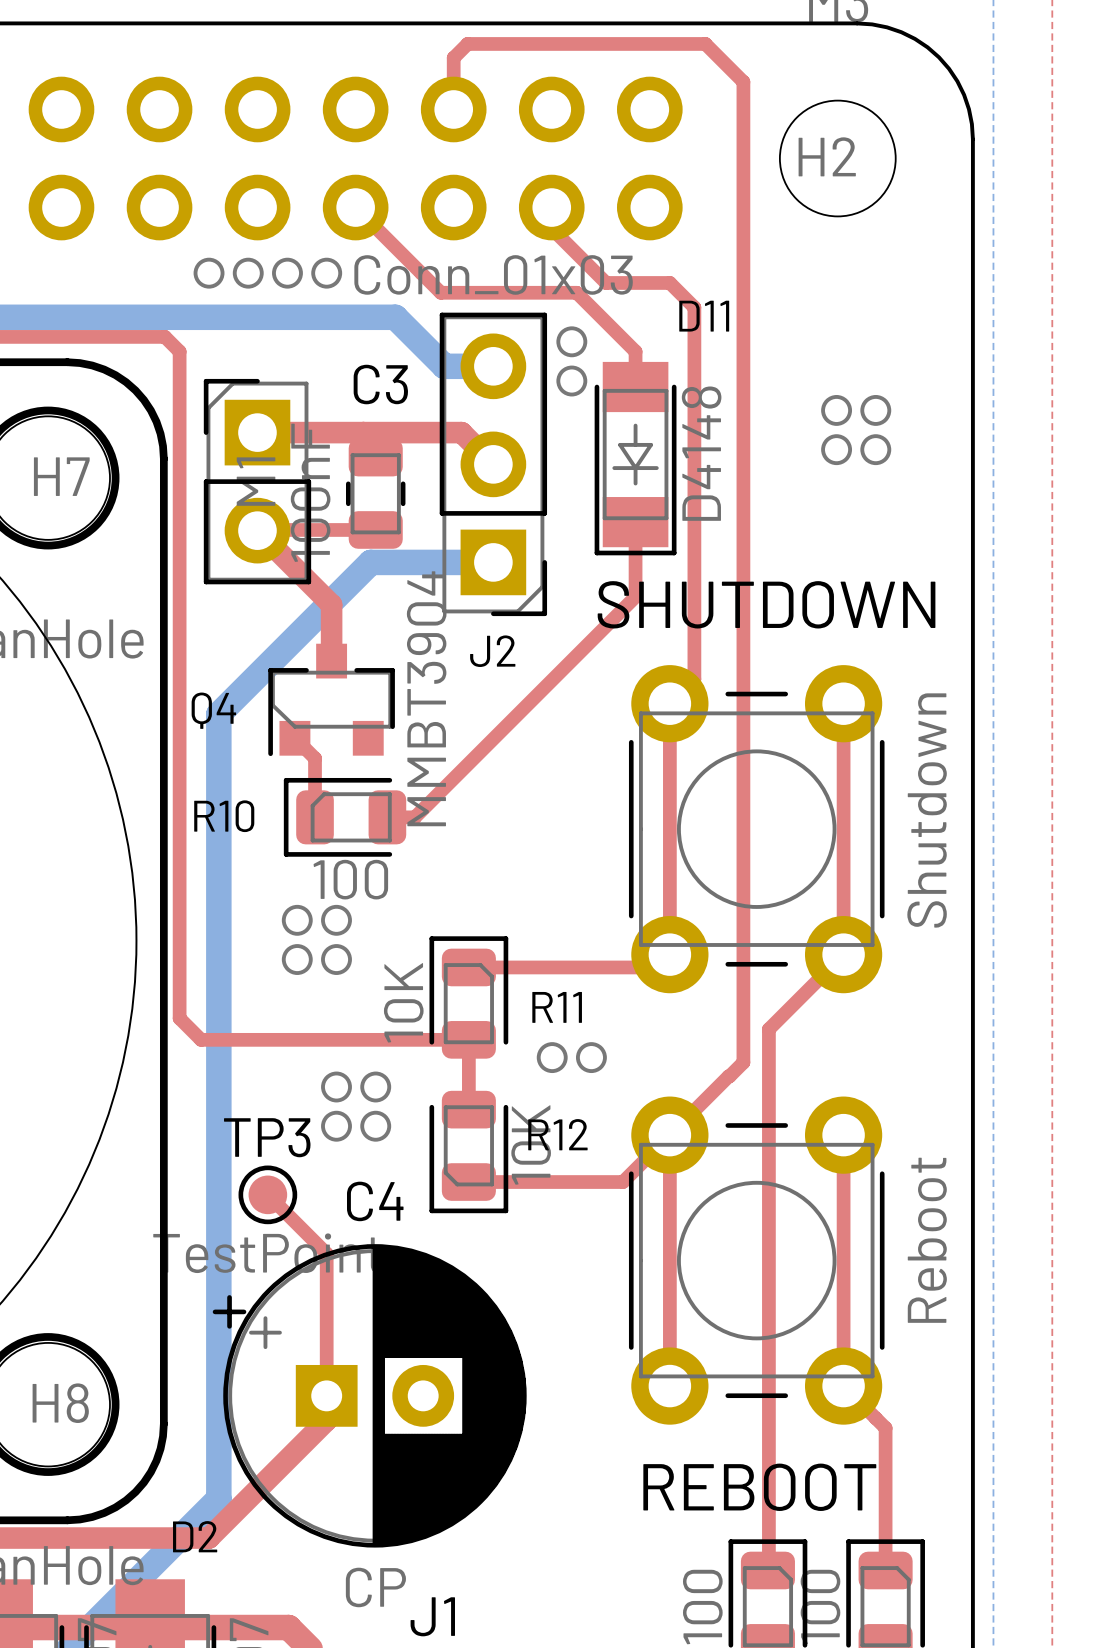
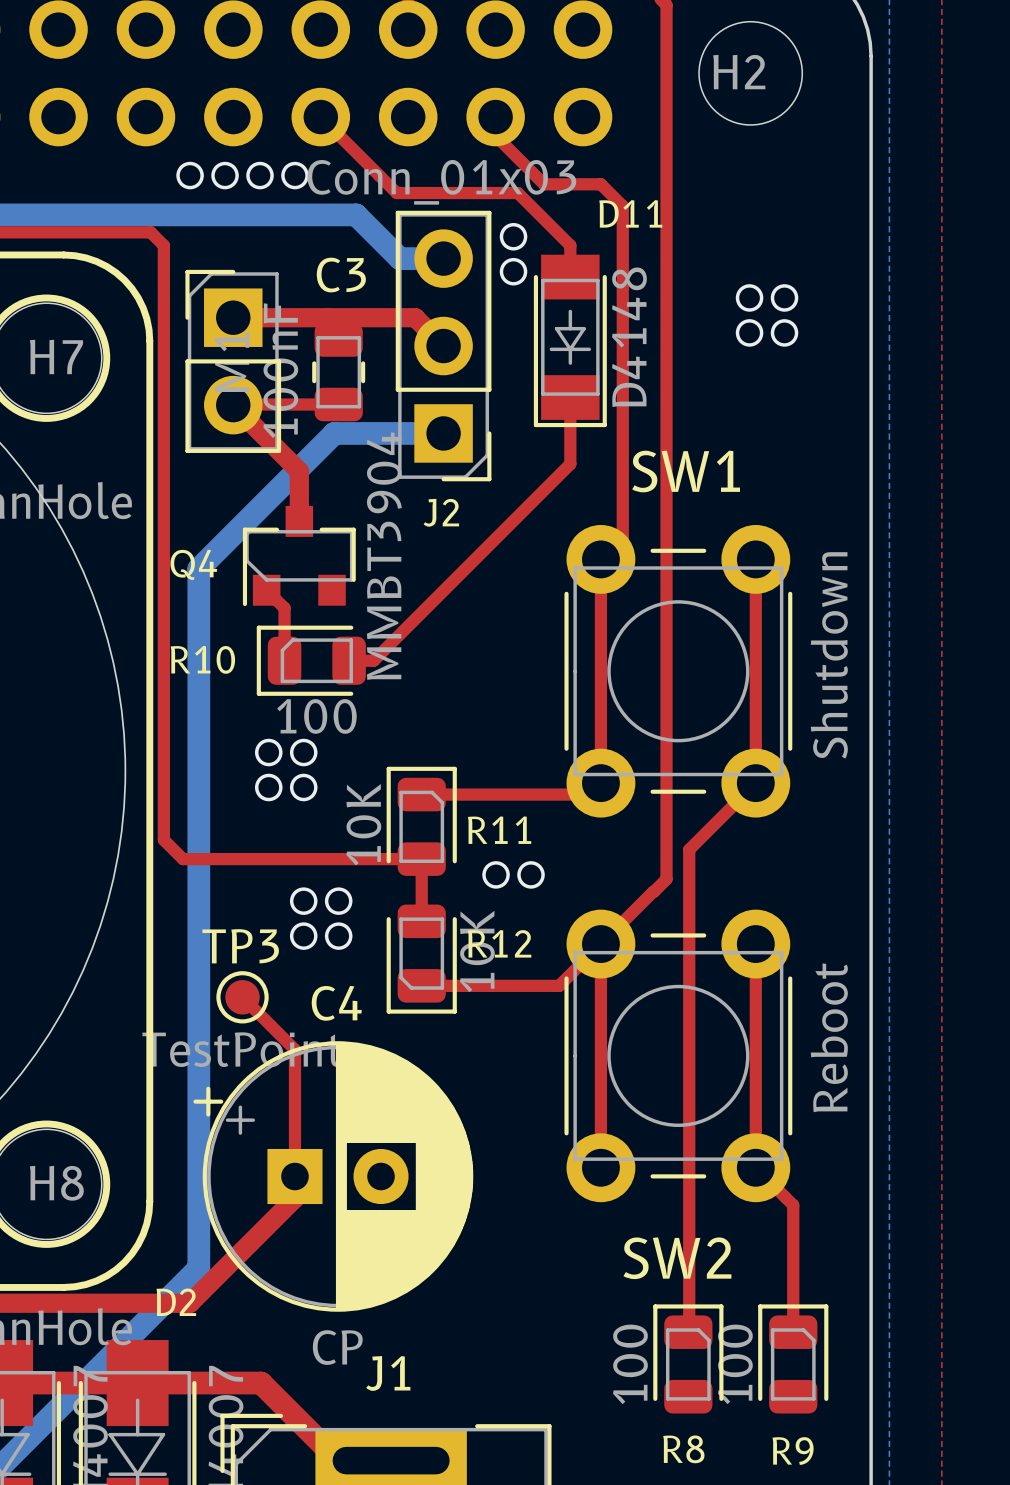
SHUTDOWN name: SHUTDOWN (766, 604) -> SW1 (686, 471)
REBOOT name: REBOOT (759, 1487) -> SW2 (677, 1258)

